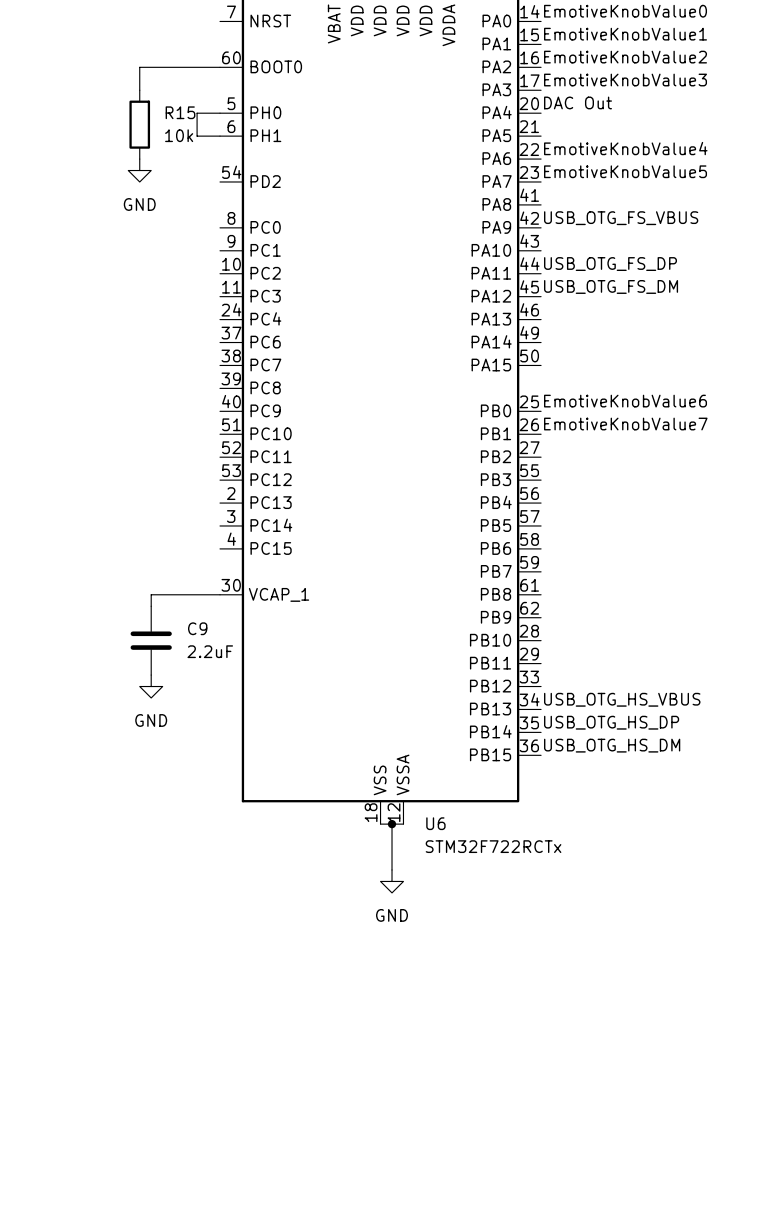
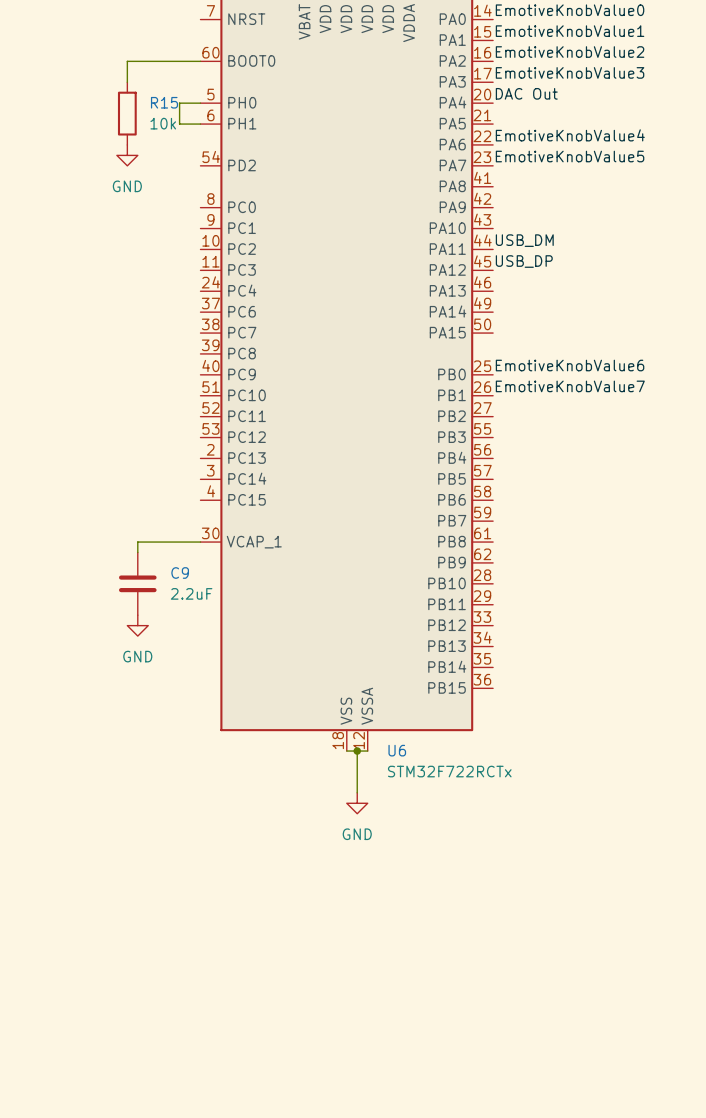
label: USB_OTG_FS_VBUS (621, 218) -> none
label: USB_OTG_FS_DP (610, 264) -> USB_DM (524, 240)
label: USB_OTG_FS_DM (611, 286) -> USB_DP (524, 261)
label: USB_OTG_HS_VBUS (622, 699) -> none
label: USB_OTG_HS_DP (611, 722) -> none
label: USB_OTG_HS_DM (612, 745) -> none

